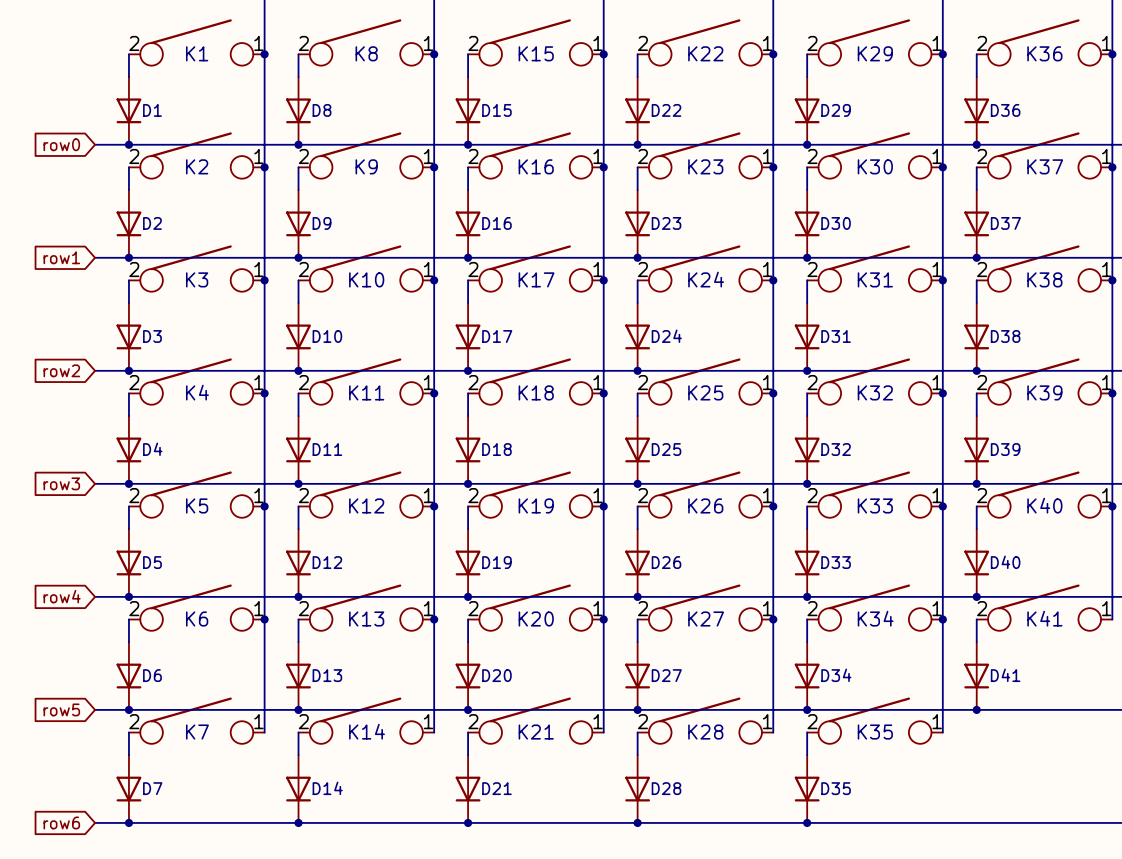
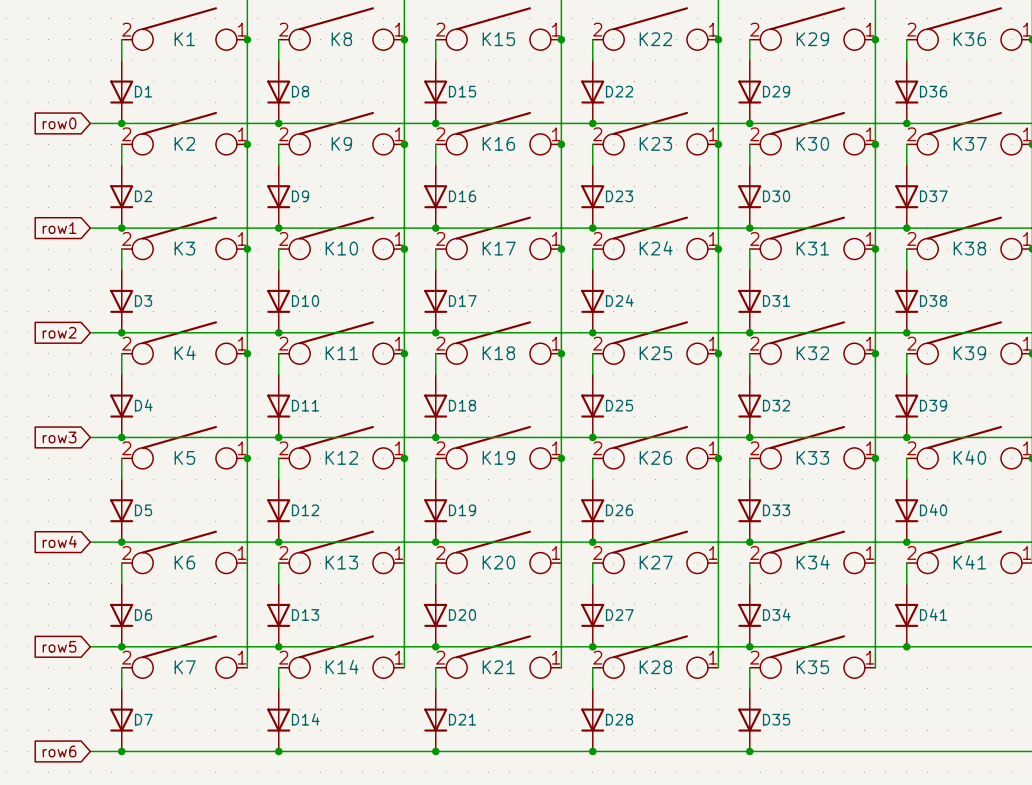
junction: (264, 619) -> none
junction: (434, 619) -> none
junction: (603, 619) -> none
junction: (773, 619) -> none
junction: (942, 619) -> none

